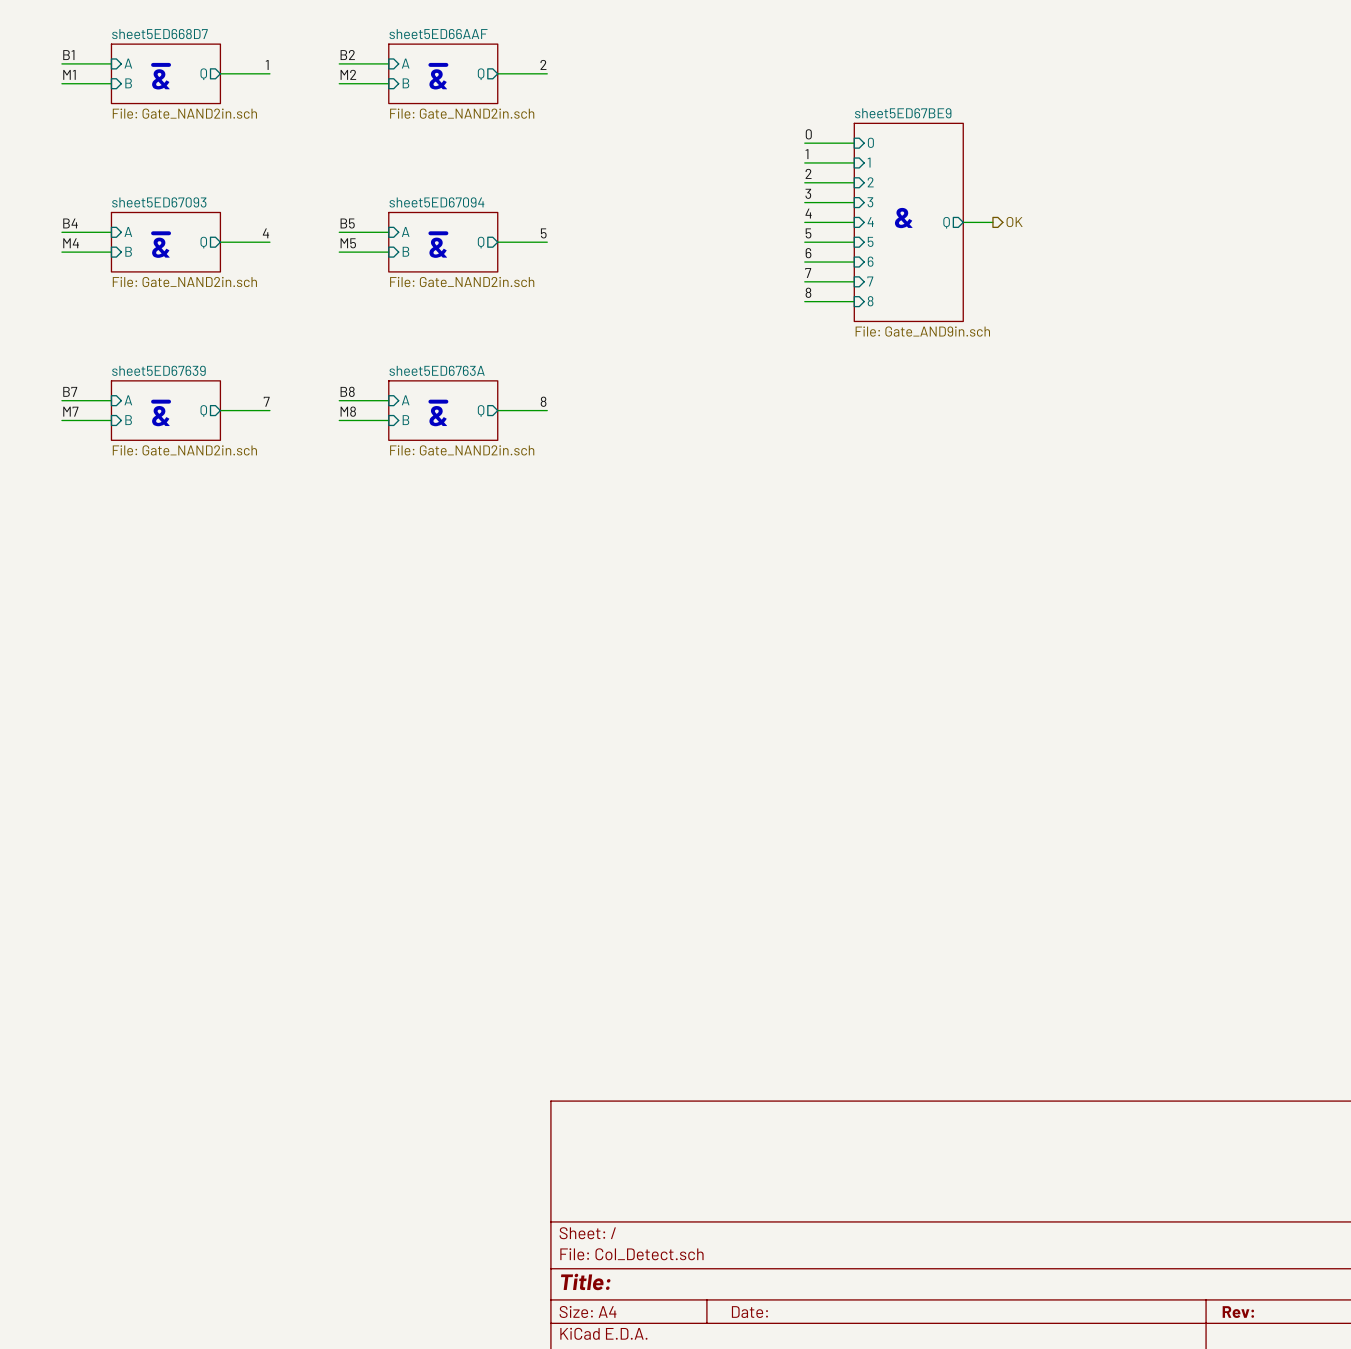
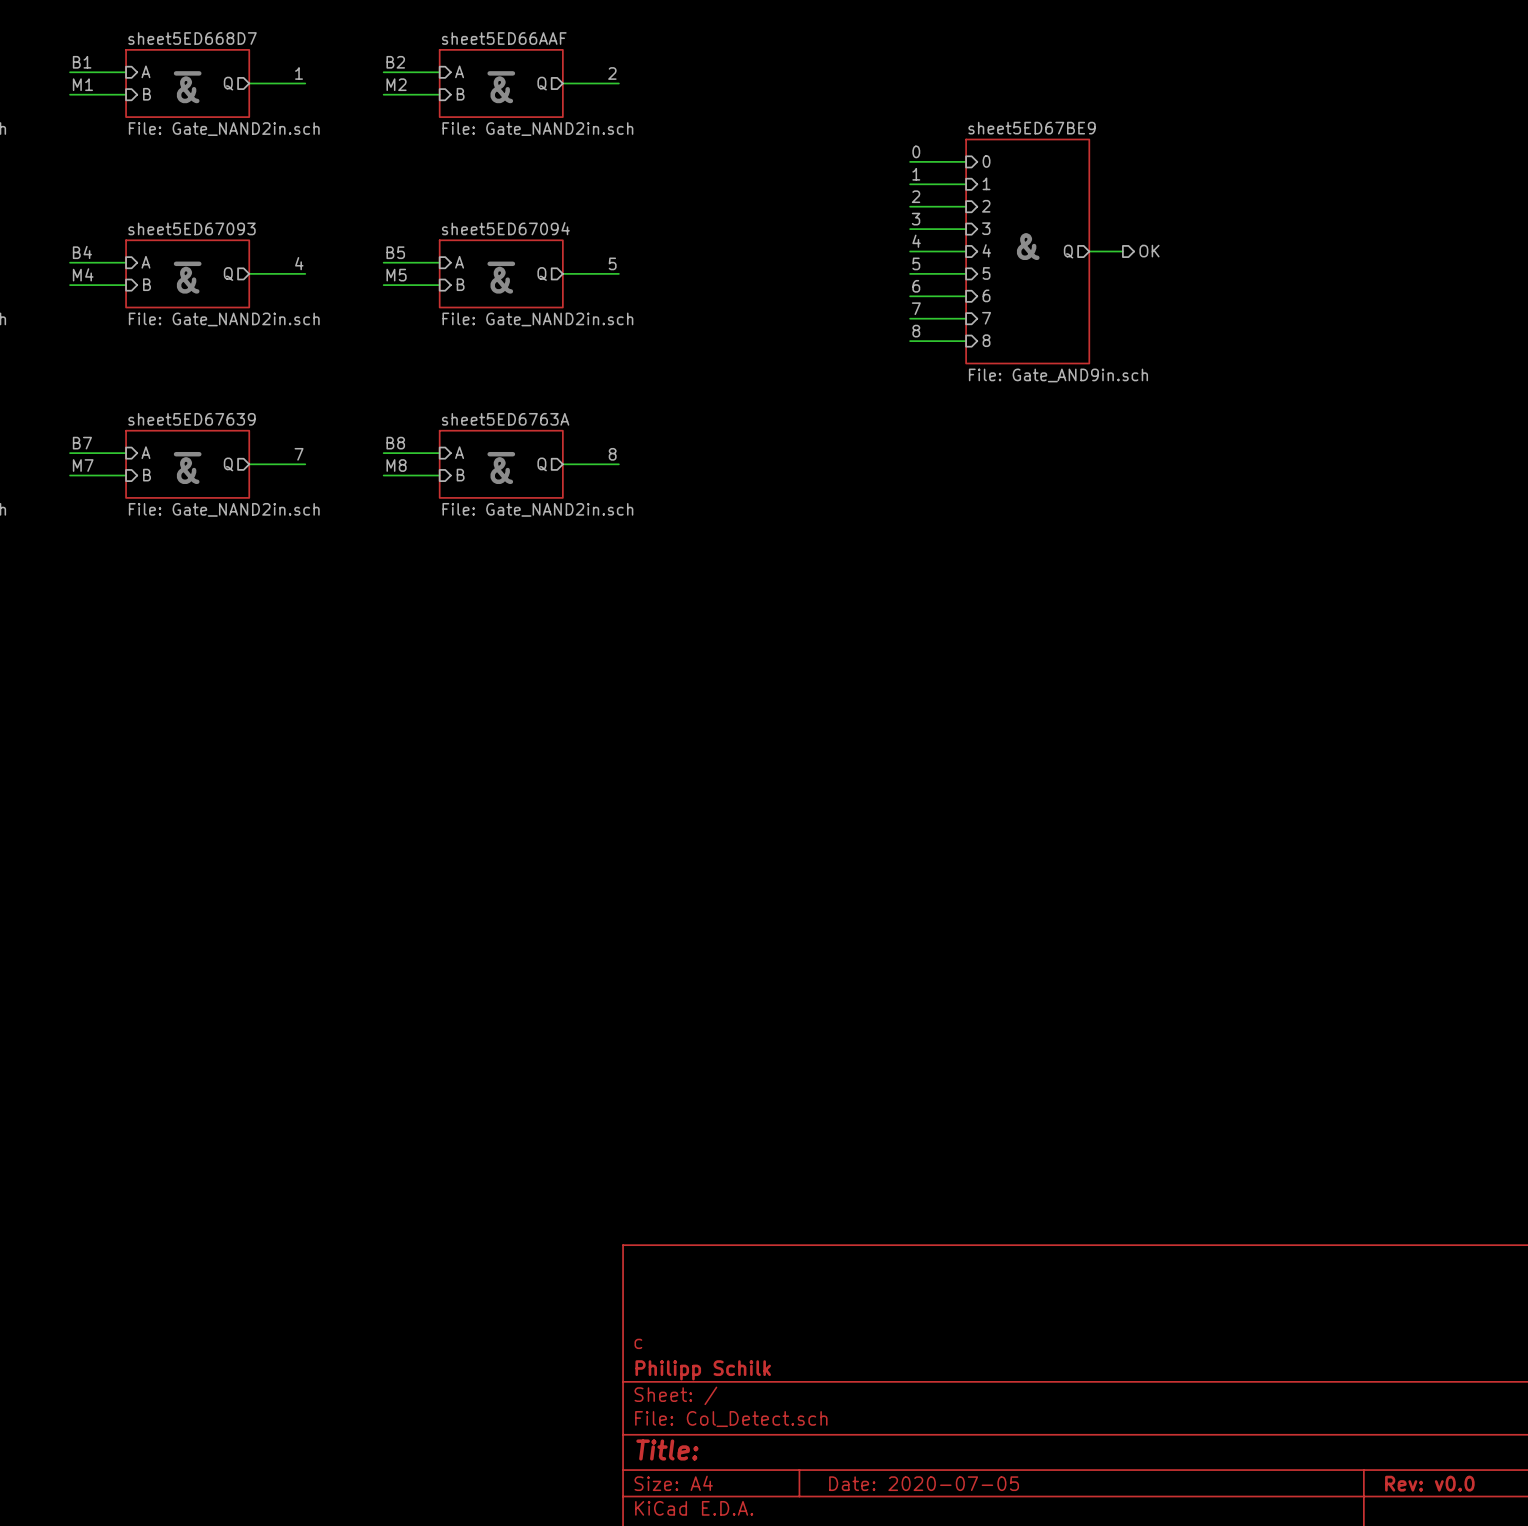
title block: none -> c (638, 1343)
title block: none -> Philipp Schilk (703, 1370)
title block: Date: (749, 1312) -> Date: 2020-07-05 (924, 1483)
title block: Rev: (1238, 1312) -> Rev: v0.0 (1429, 1483)

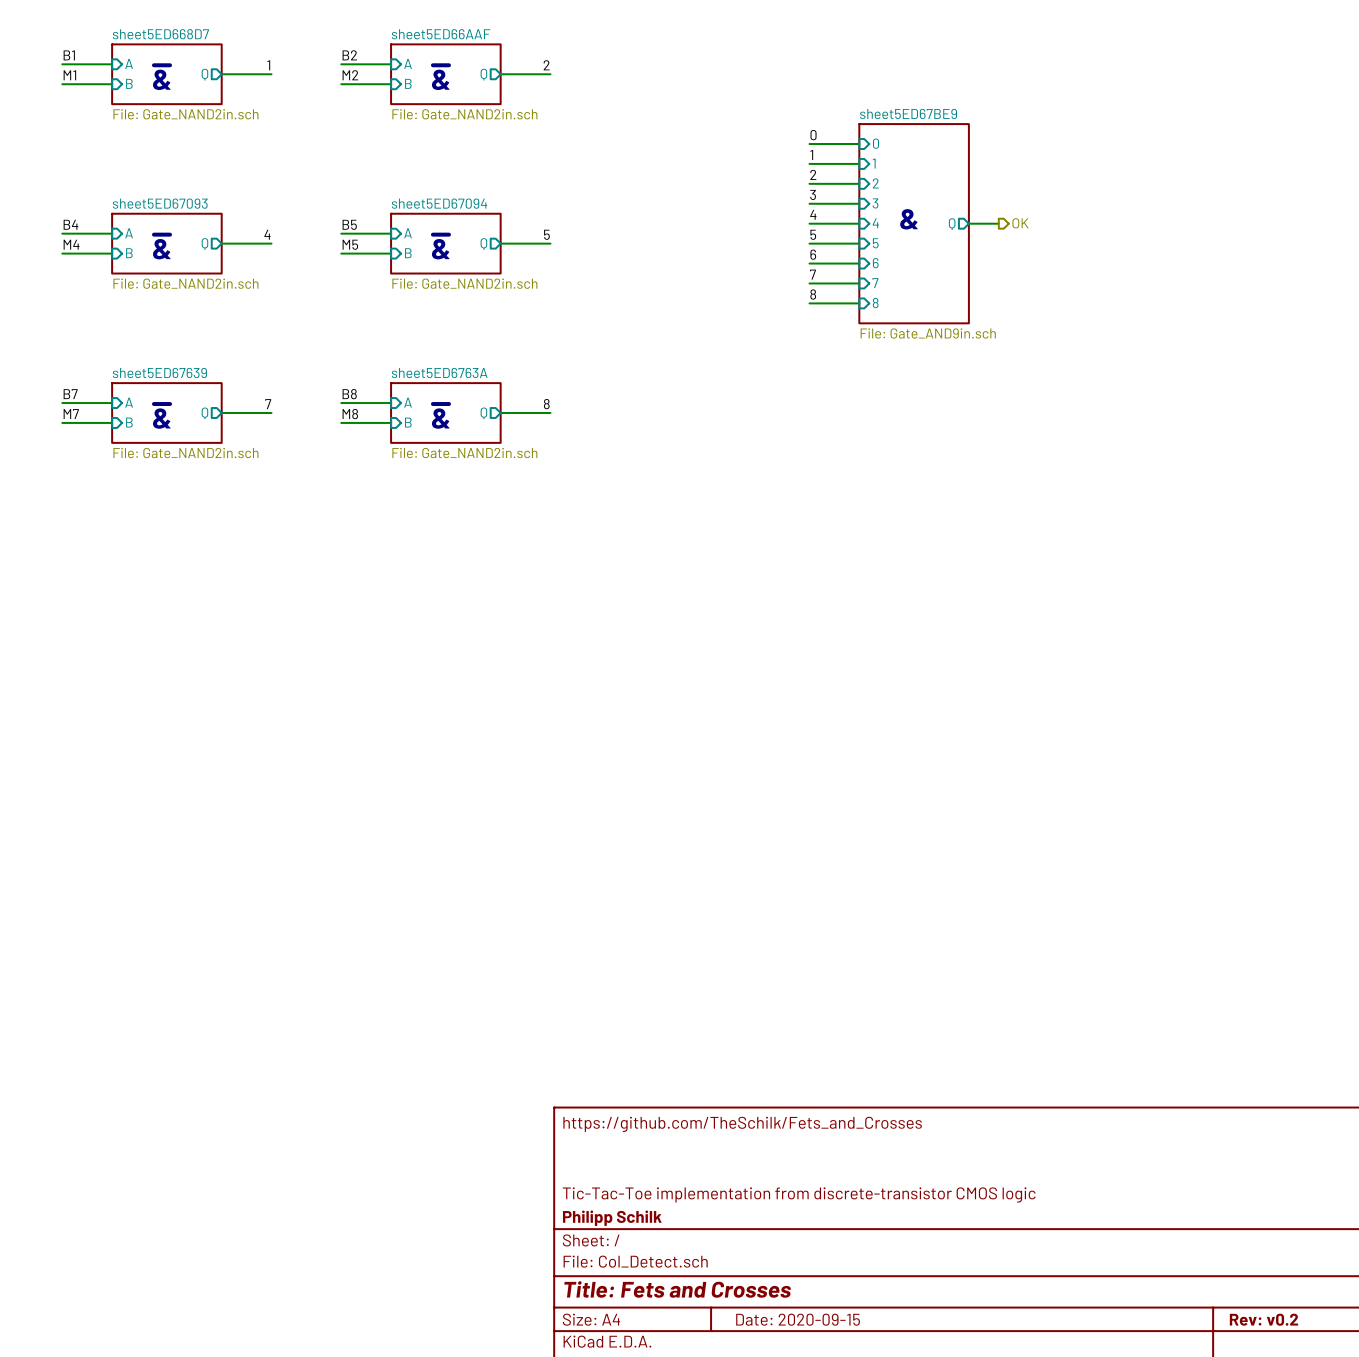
title block: none -> https://github.com/TheSchilk/Fets_and_Crosses (742, 1124)
title block: c (638, 1343) -> Tic-Tac-Toe implementation from discrete-transistor CMOS logic (799, 1194)
title block: Title: (667, 1449) -> Title: Fets and Crosses (677, 1289)
title block: Date: 2020-07-05 (924, 1483) -> Date: 2020-09-15 (798, 1319)
title block: Rev: v0.0 (1429, 1483) -> Rev: v0.2 (1263, 1319)

